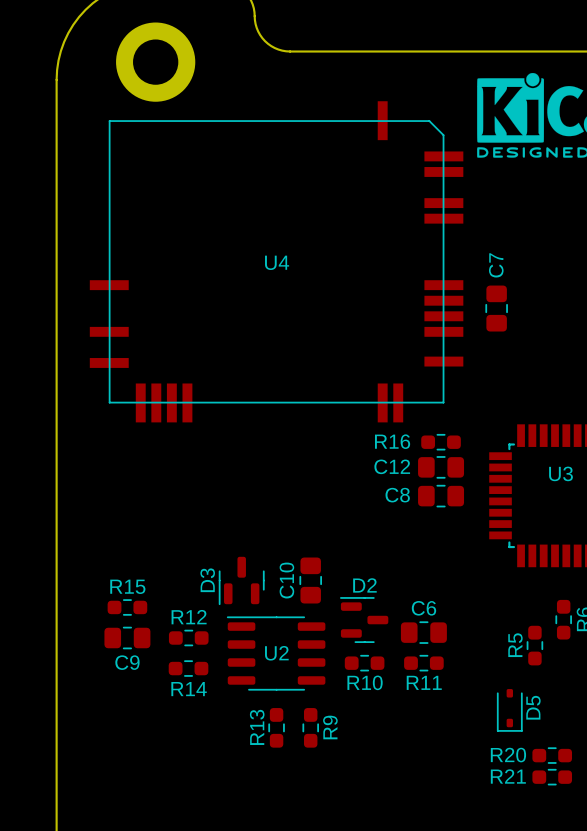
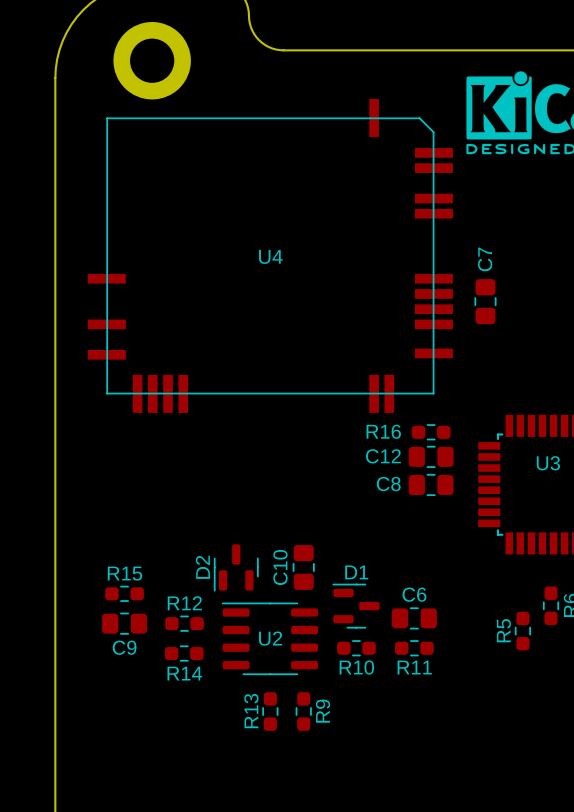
D3 name: D3 (207, 580) -> D2 (202, 567)
D2 name: D2 (364, 585) -> D1 (356, 572)
D5: (509, 710) -> none
R20: (552, 755) -> none
R21: (552, 777) -> none

